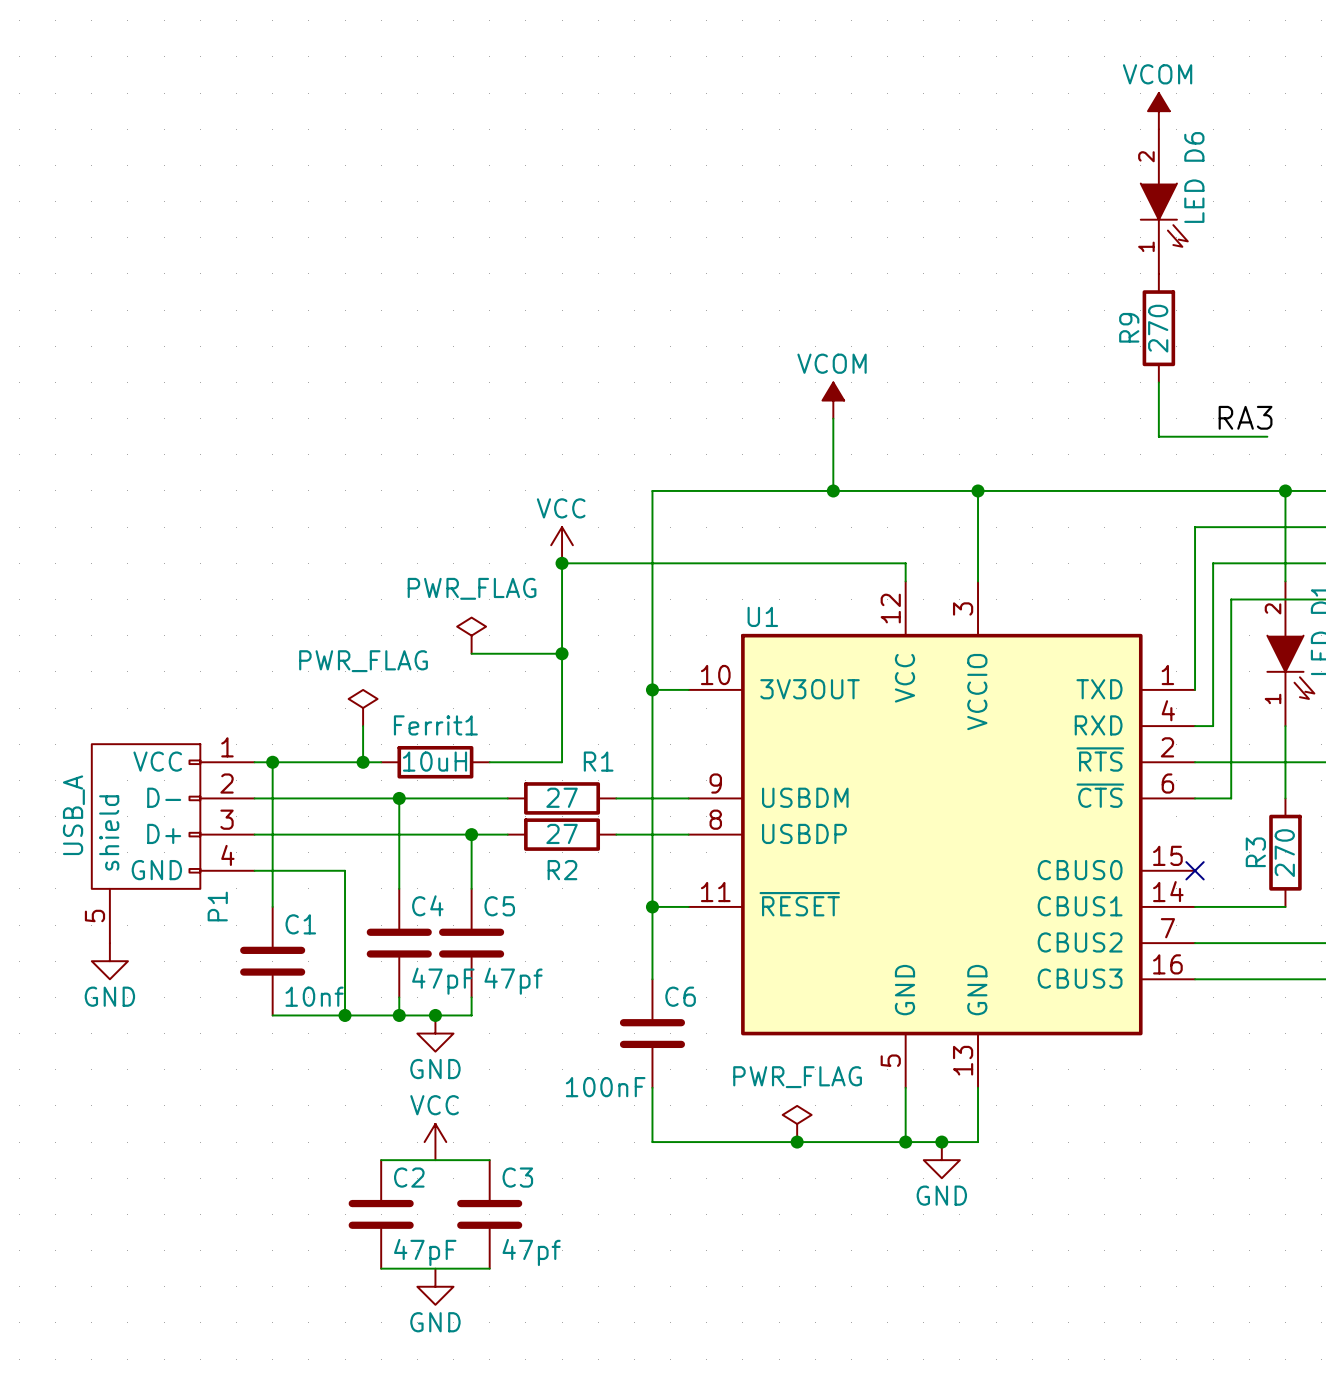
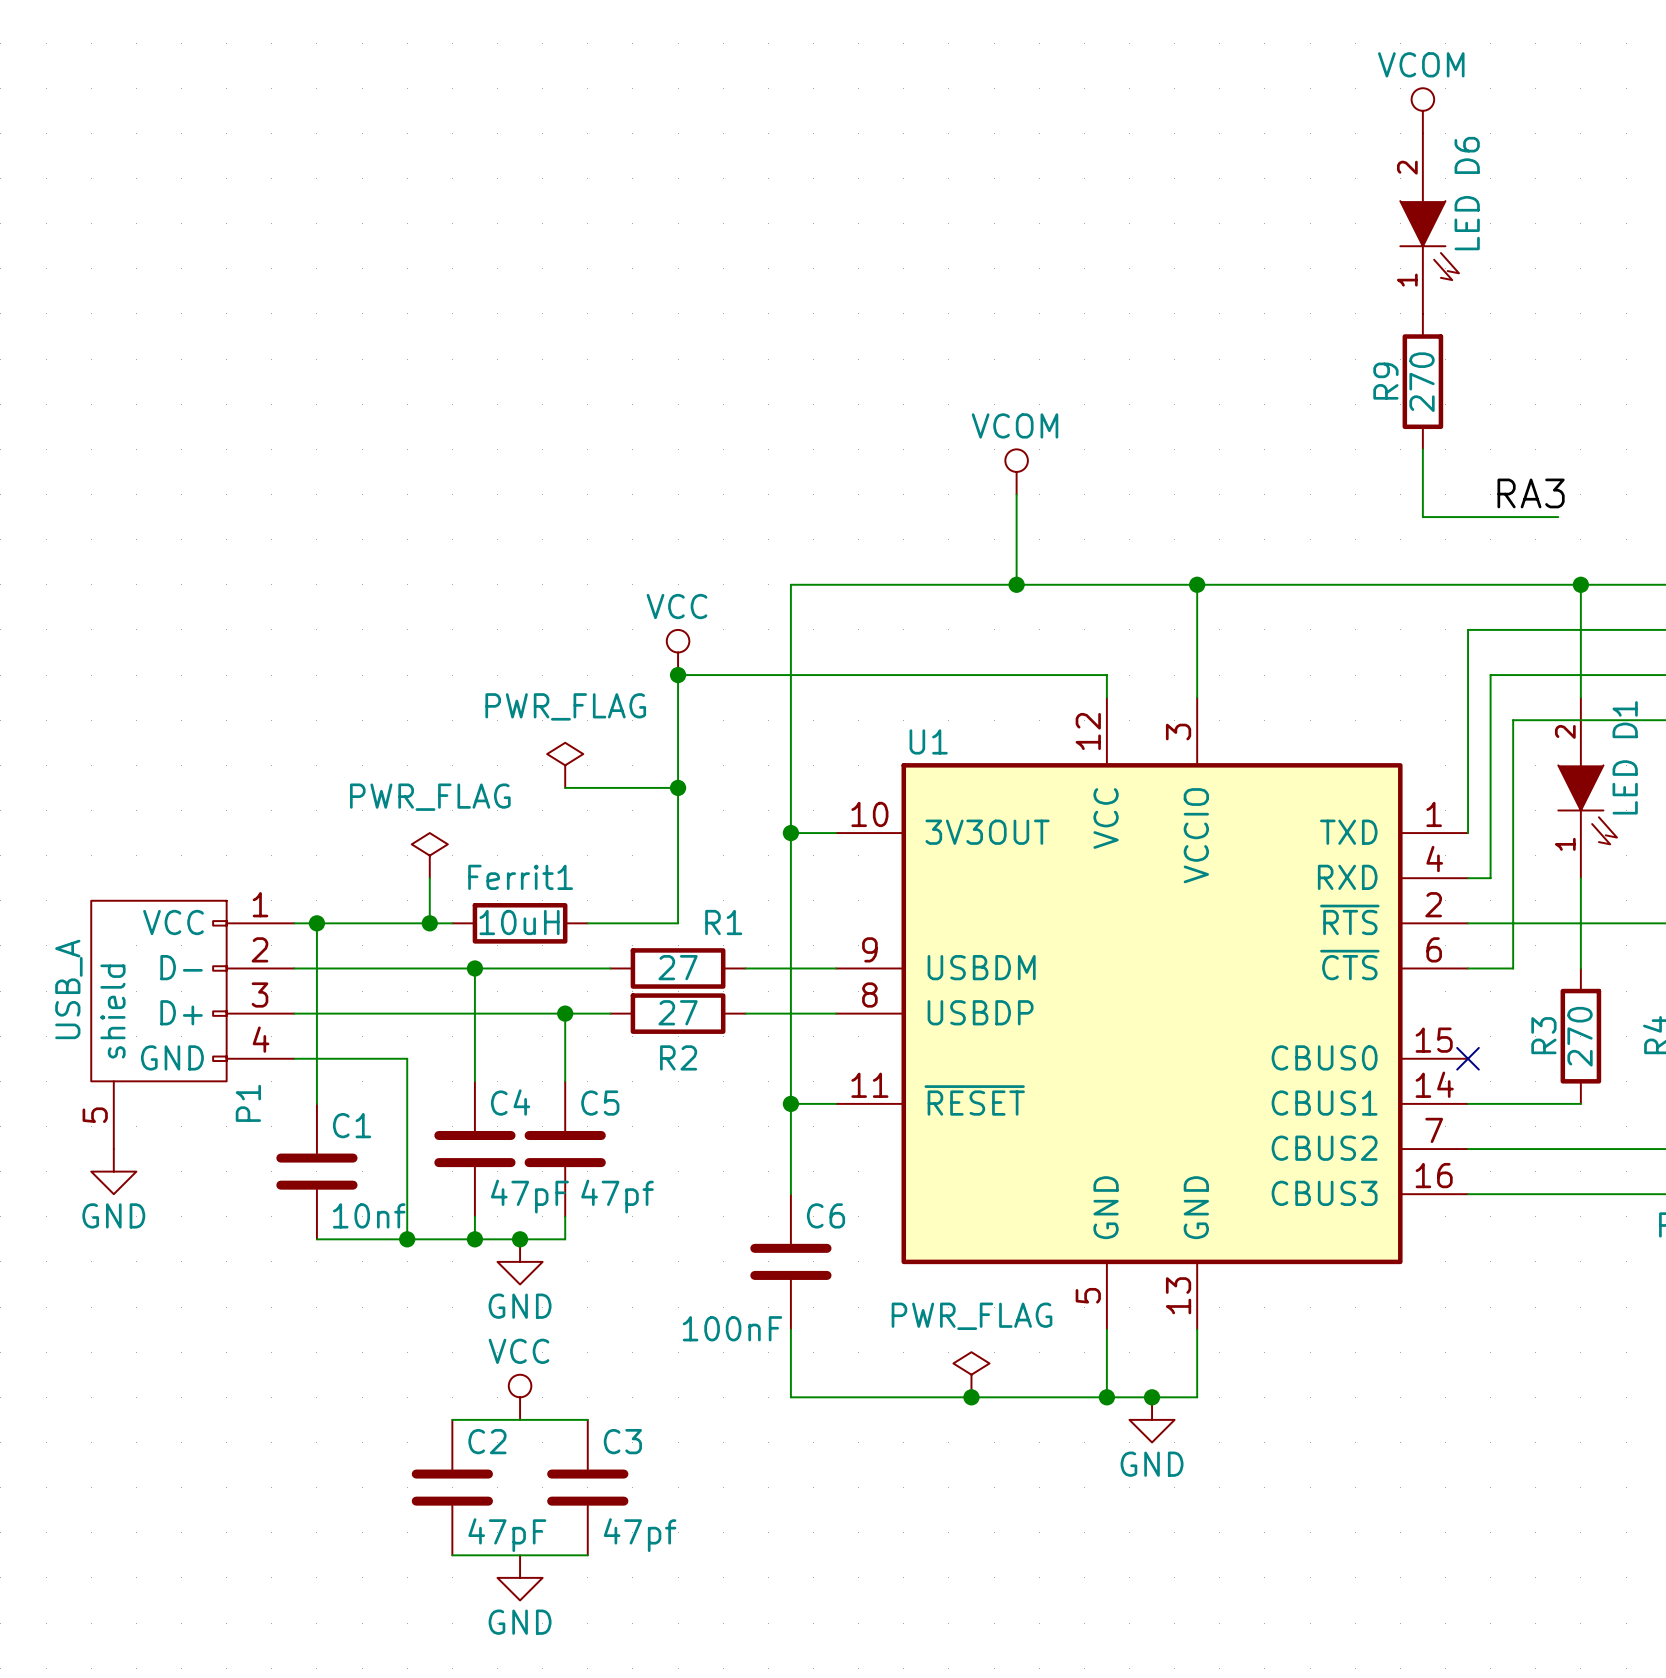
power symbol shape: [1148, 93, 1170, 130] -> [1411, 88, 1435, 134]
power symbol shape: [822, 382, 845, 419] -> [1005, 449, 1028, 495]
power symbol shape: [551, 527, 573, 564] -> [666, 629, 690, 676]
power symbol shape: [424, 1123, 447, 1161] -> [508, 1374, 532, 1420]

